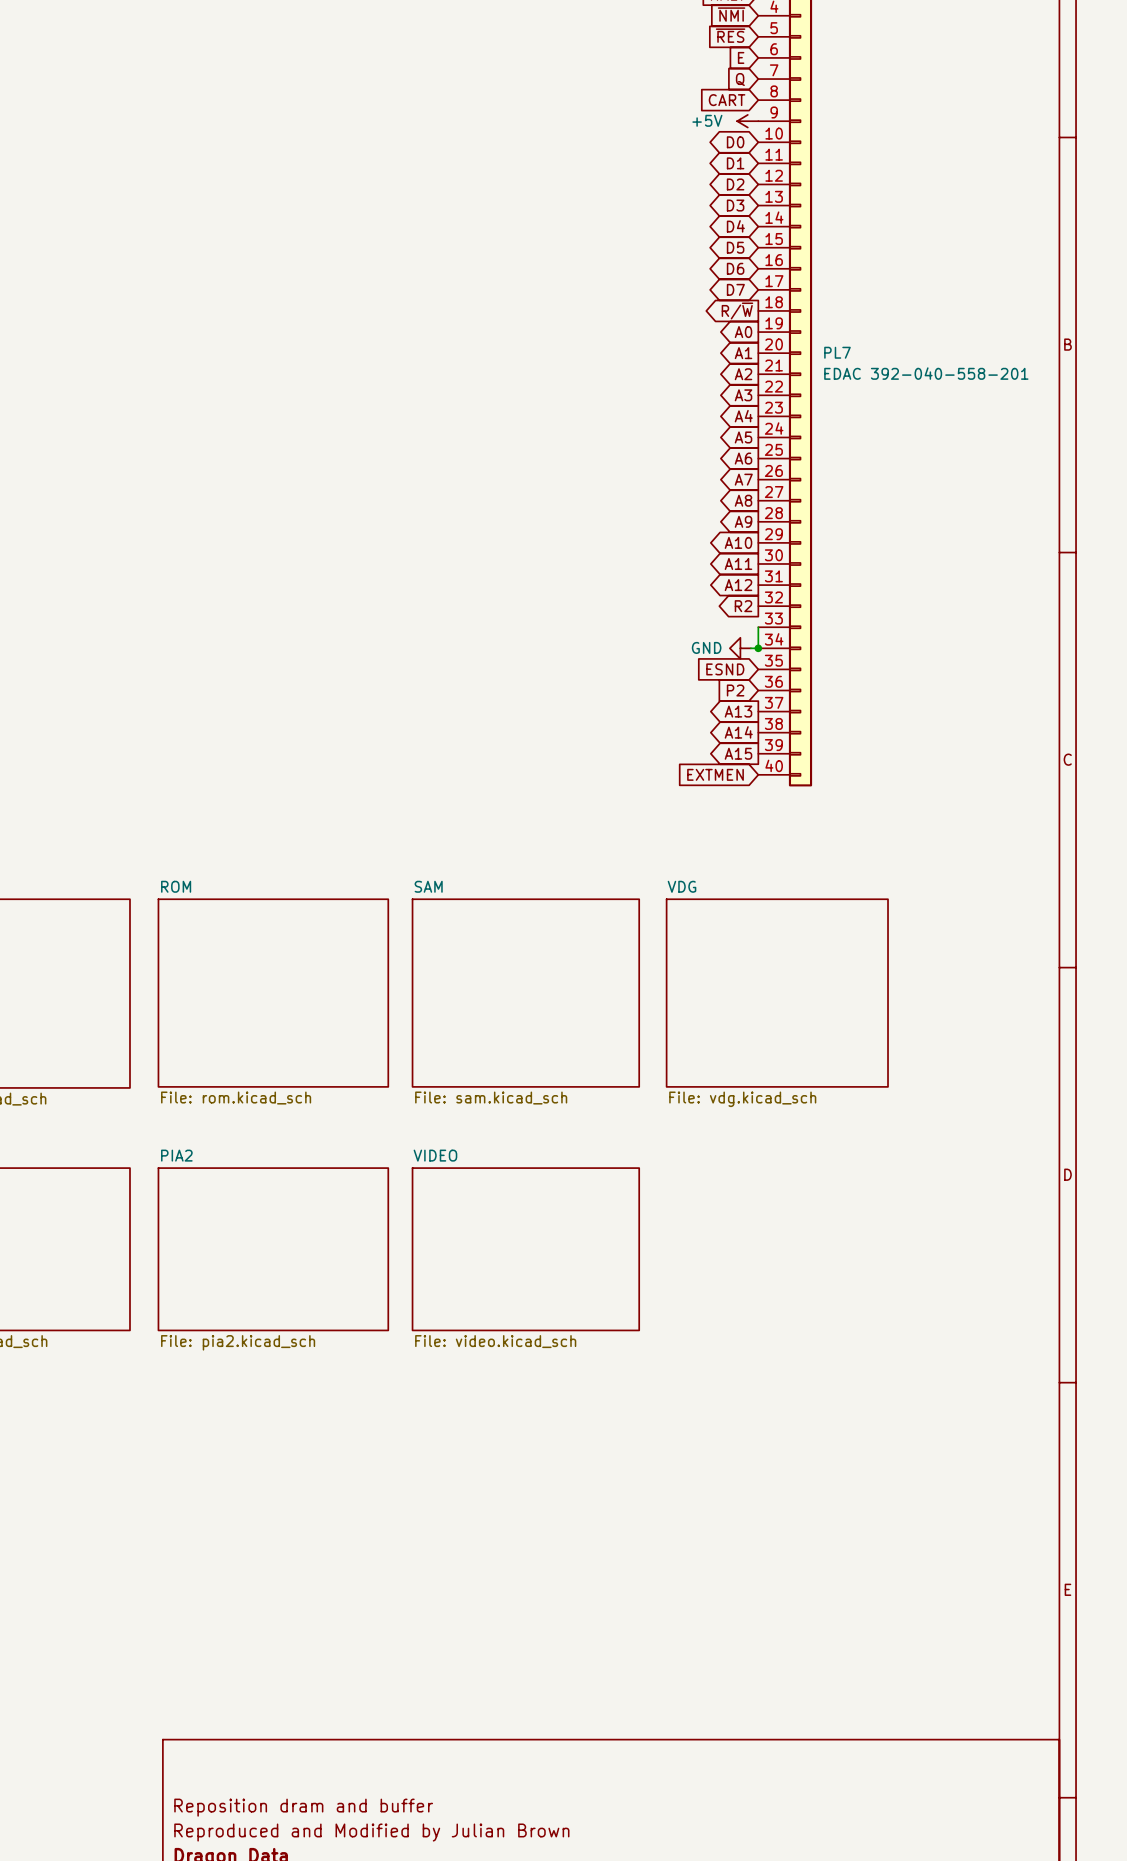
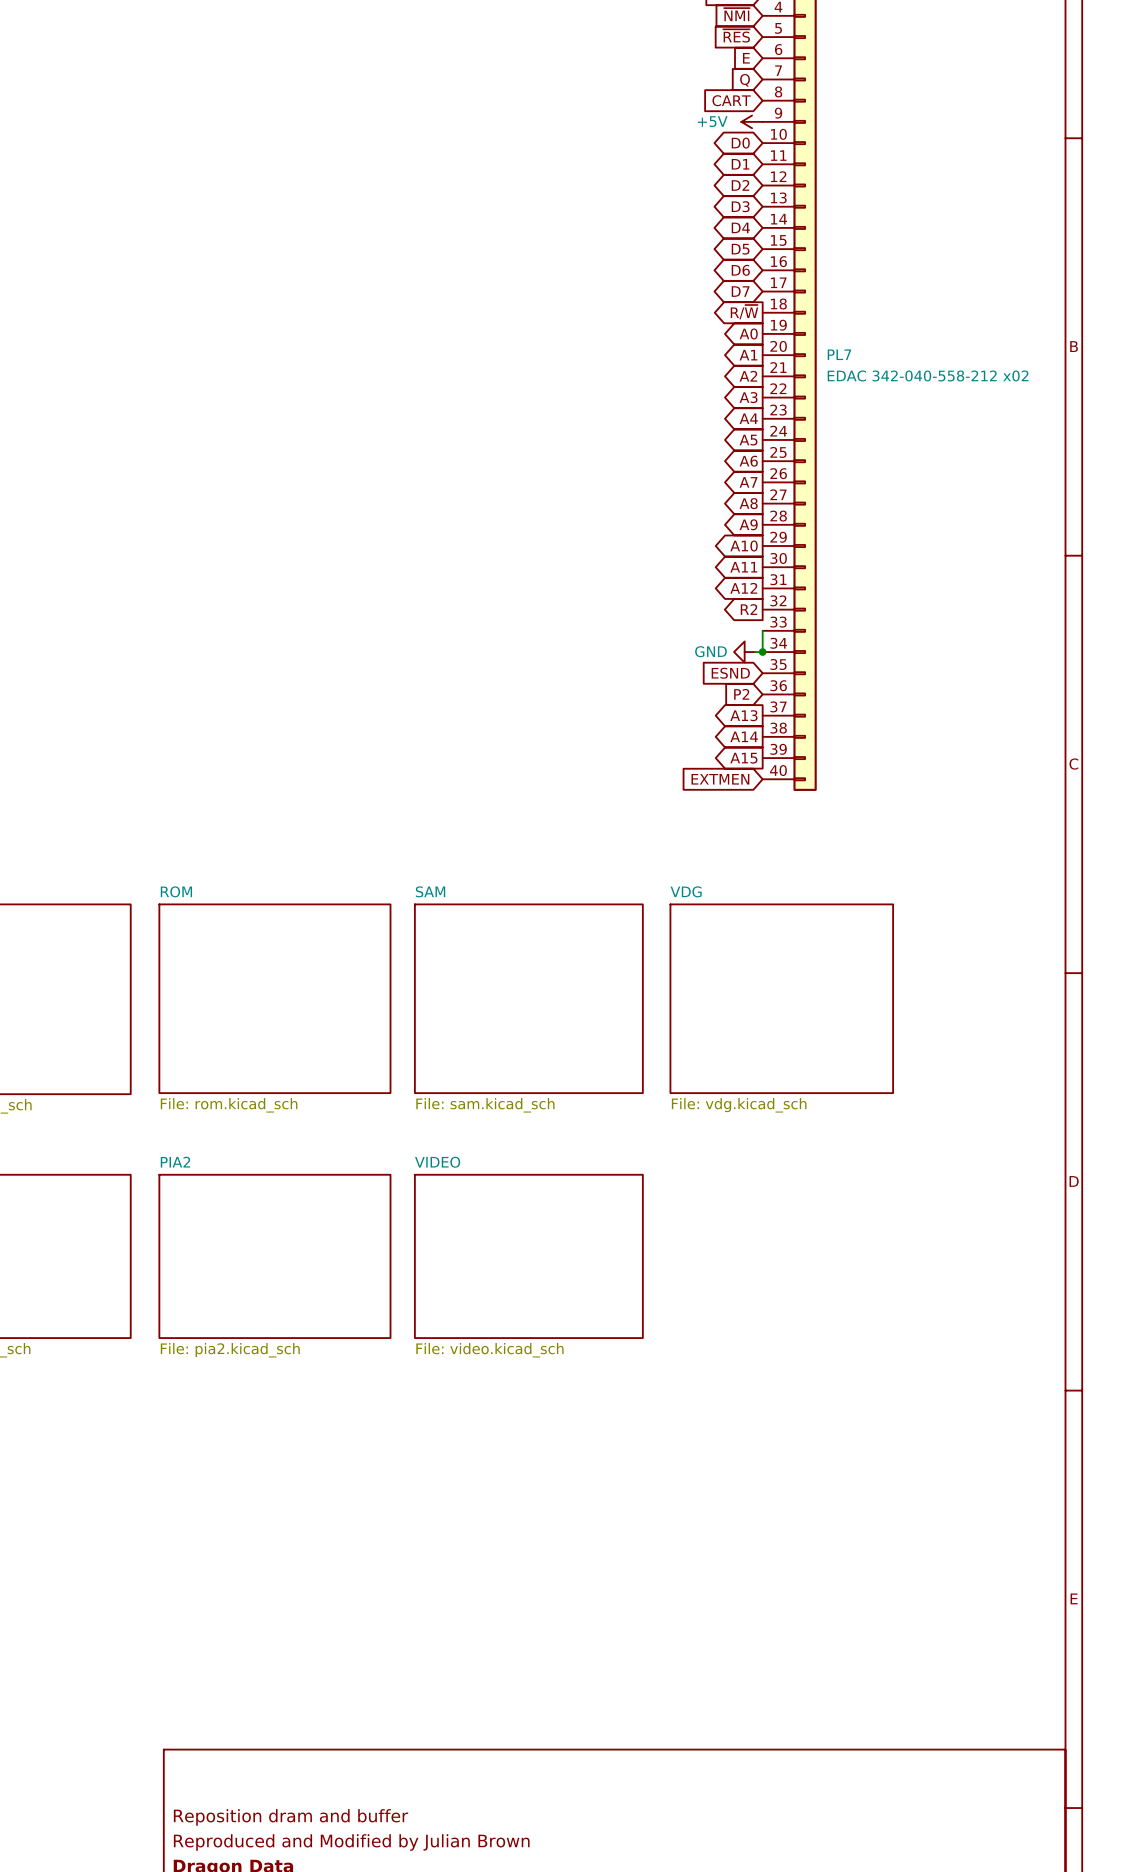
PL7 value: EDAC 392-040-558-201 (926, 373) -> EDAC 342-040-558-212 x02 (928, 375)

